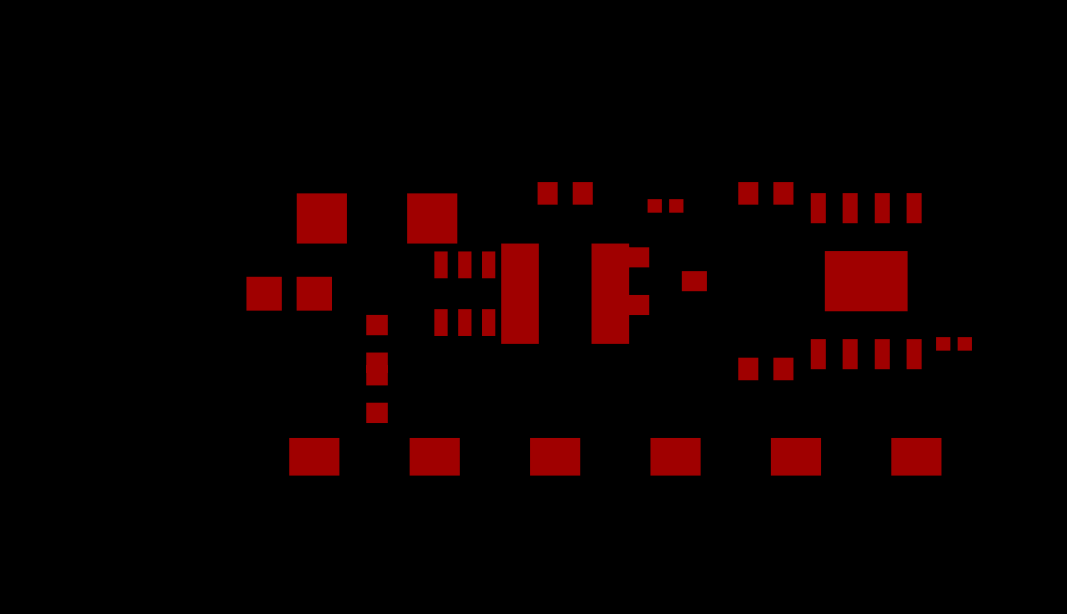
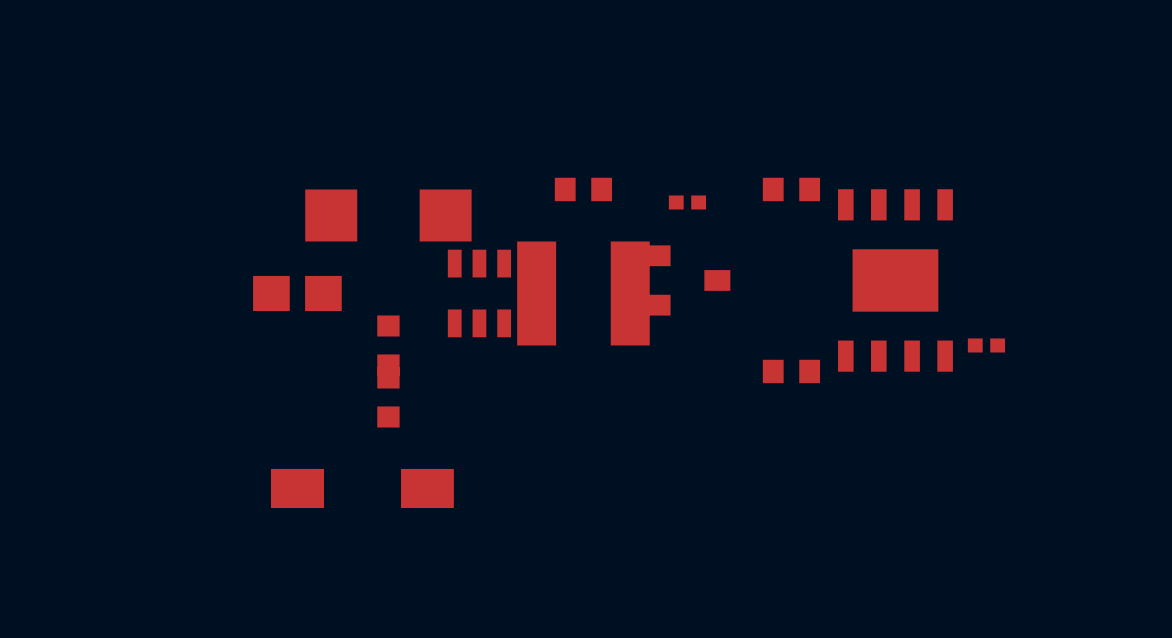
part position: (314, 456) -> (297, 488)
part position: (434, 456) -> (427, 488)
part: (555, 456) -> none
part: (675, 456) -> none
part: (795, 456) -> none
part: (916, 456) -> none

